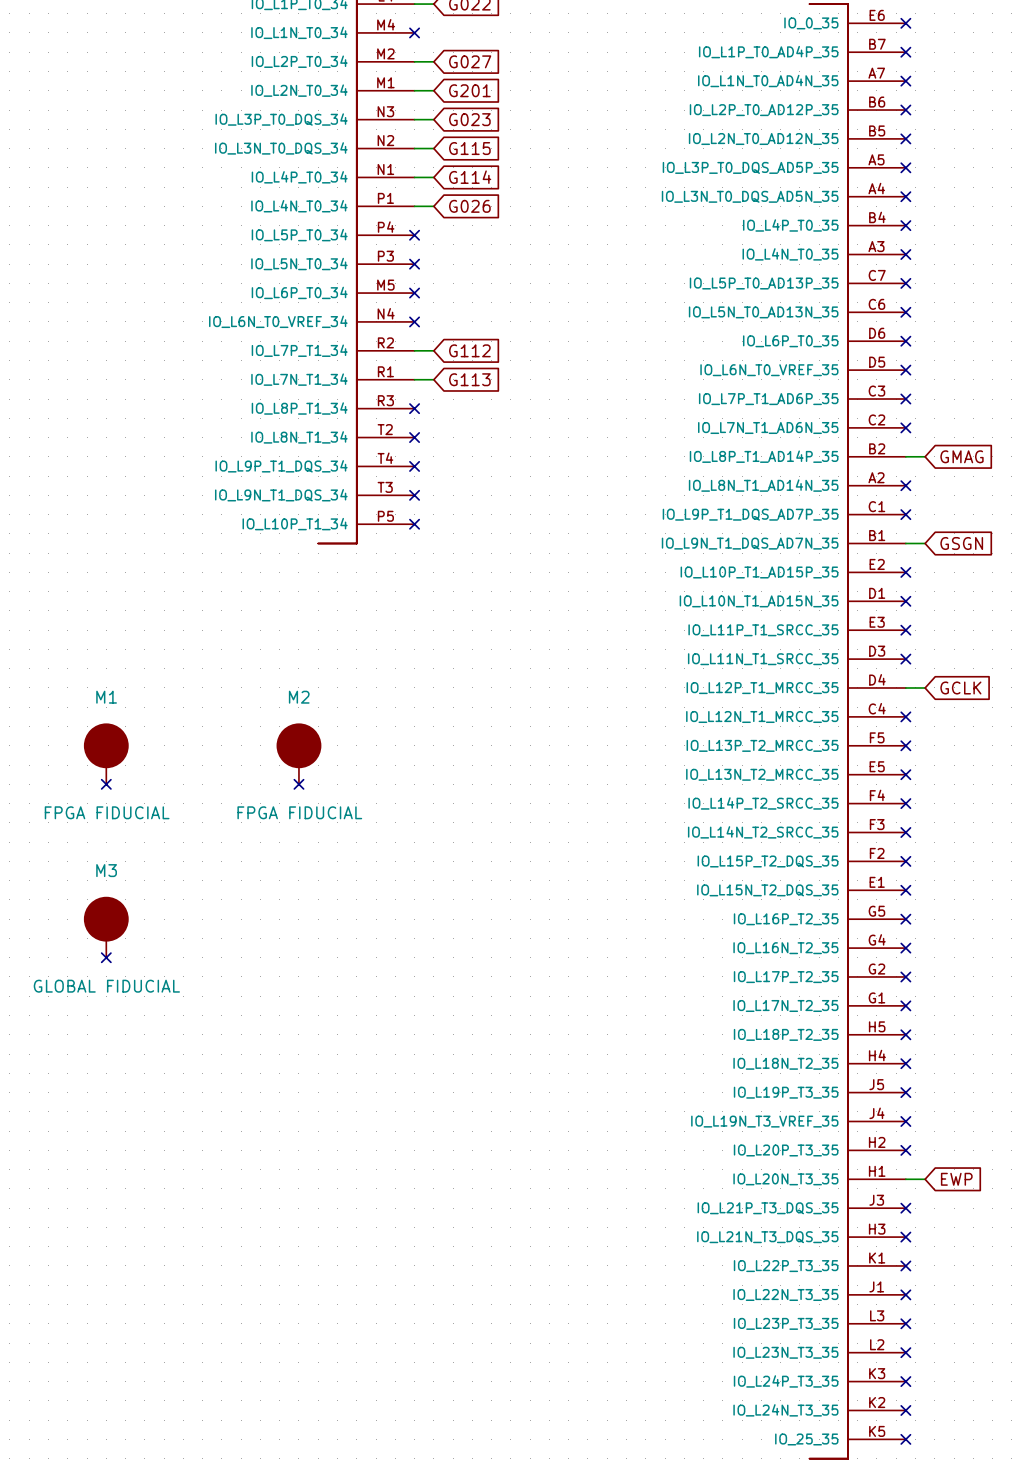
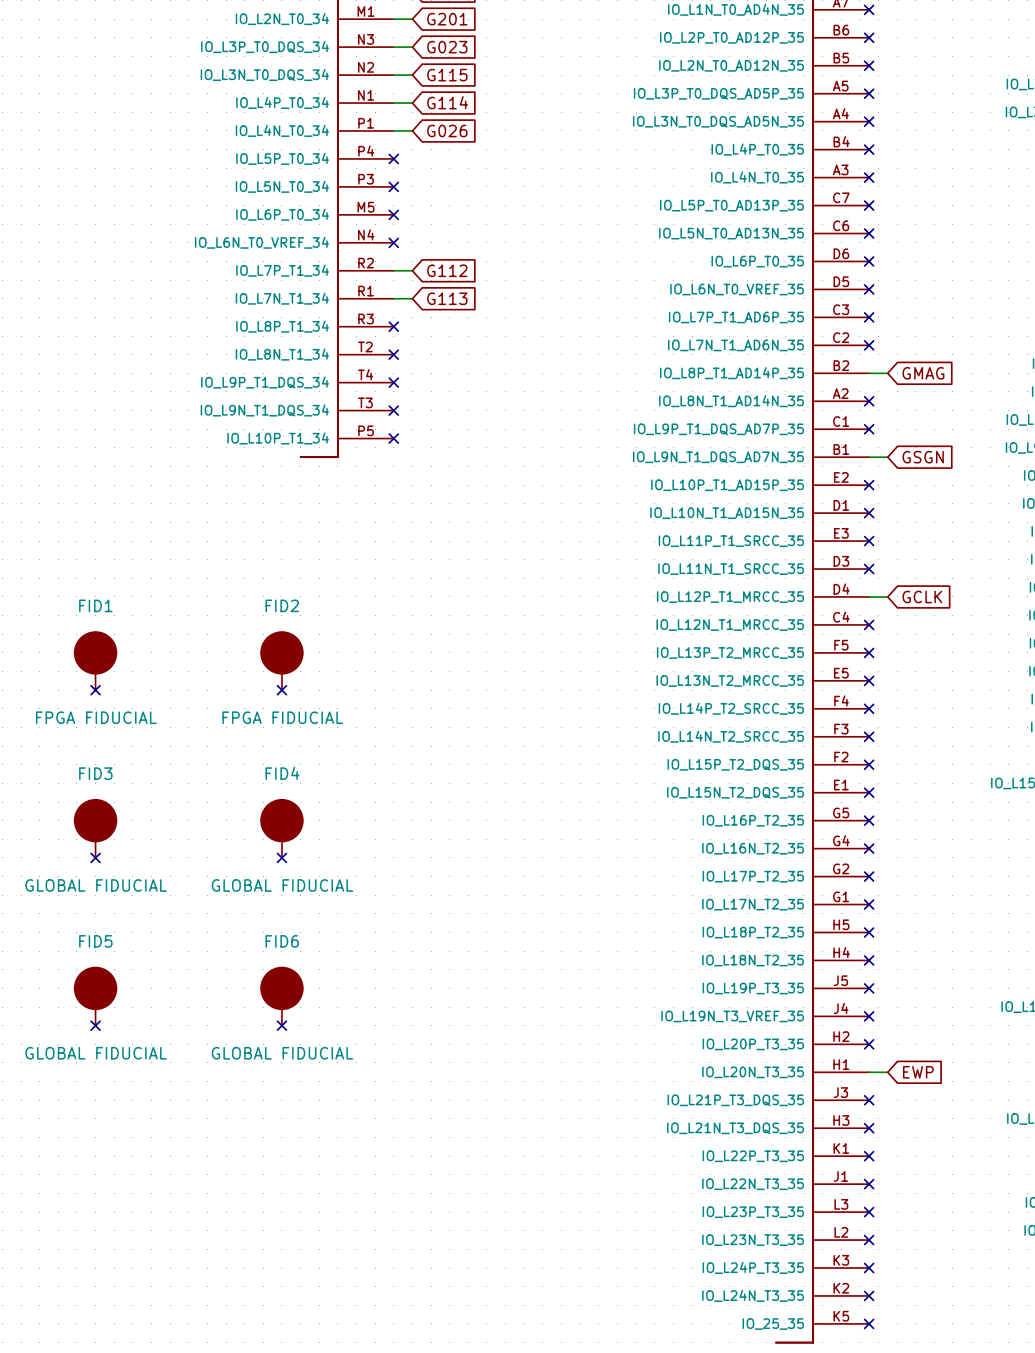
M1 name: M1 (106, 697) -> FID1 (95, 605)
M2 name: M2 (299, 697) -> FID2 (282, 605)
M3 name: M3 (106, 870) -> FID3 (95, 773)
FID4: none -> GLOBAL FIDUCIAL (281, 828)
no-connect mark: none -> (281, 857)
FID5: none -> GLOBAL FIDUCIAL (95, 996)
FID6: none -> GLOBAL FIDUCIAL (281, 996)
no-connect mark: none -> (95, 1025)
no-connect mark: none -> (281, 1025)

